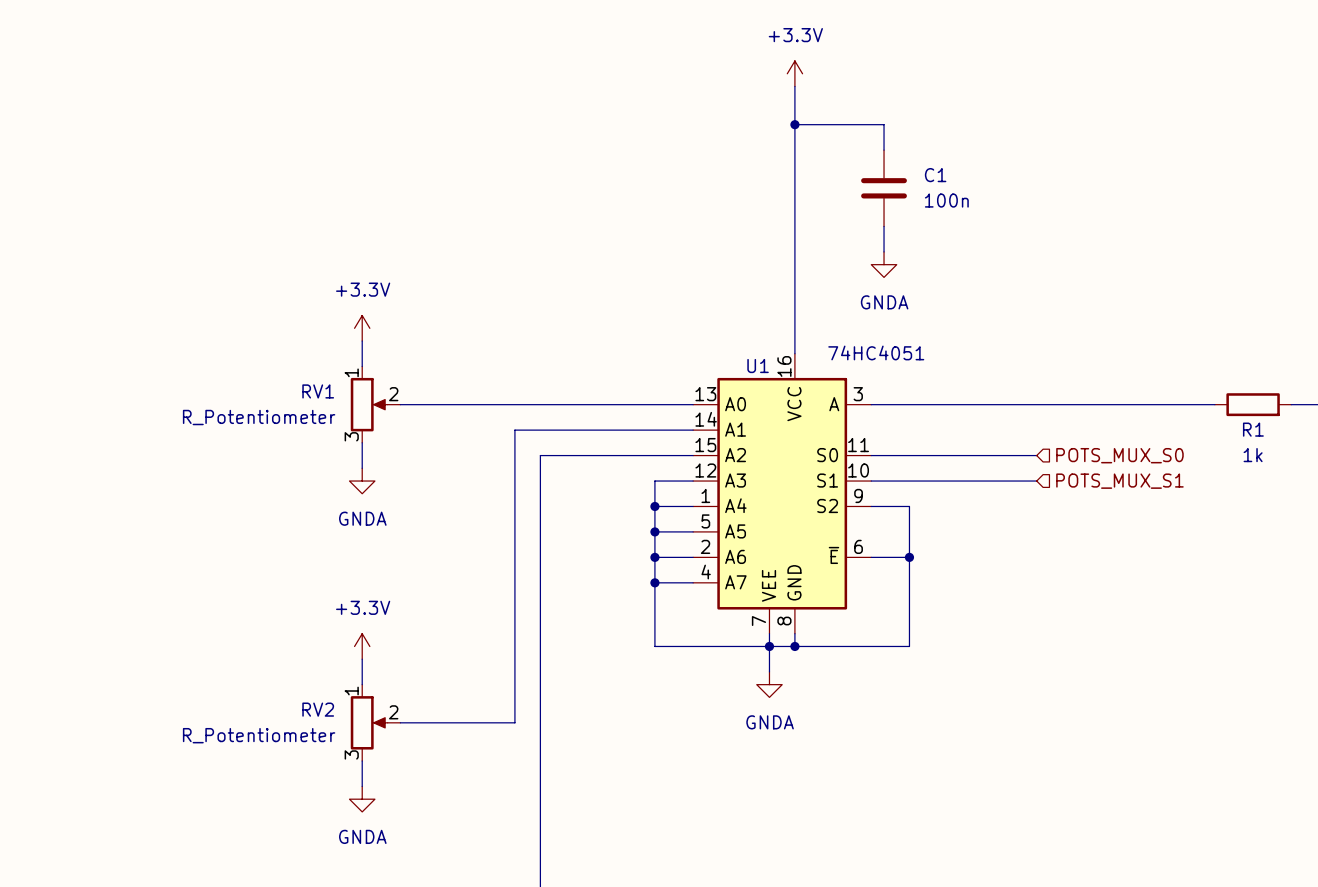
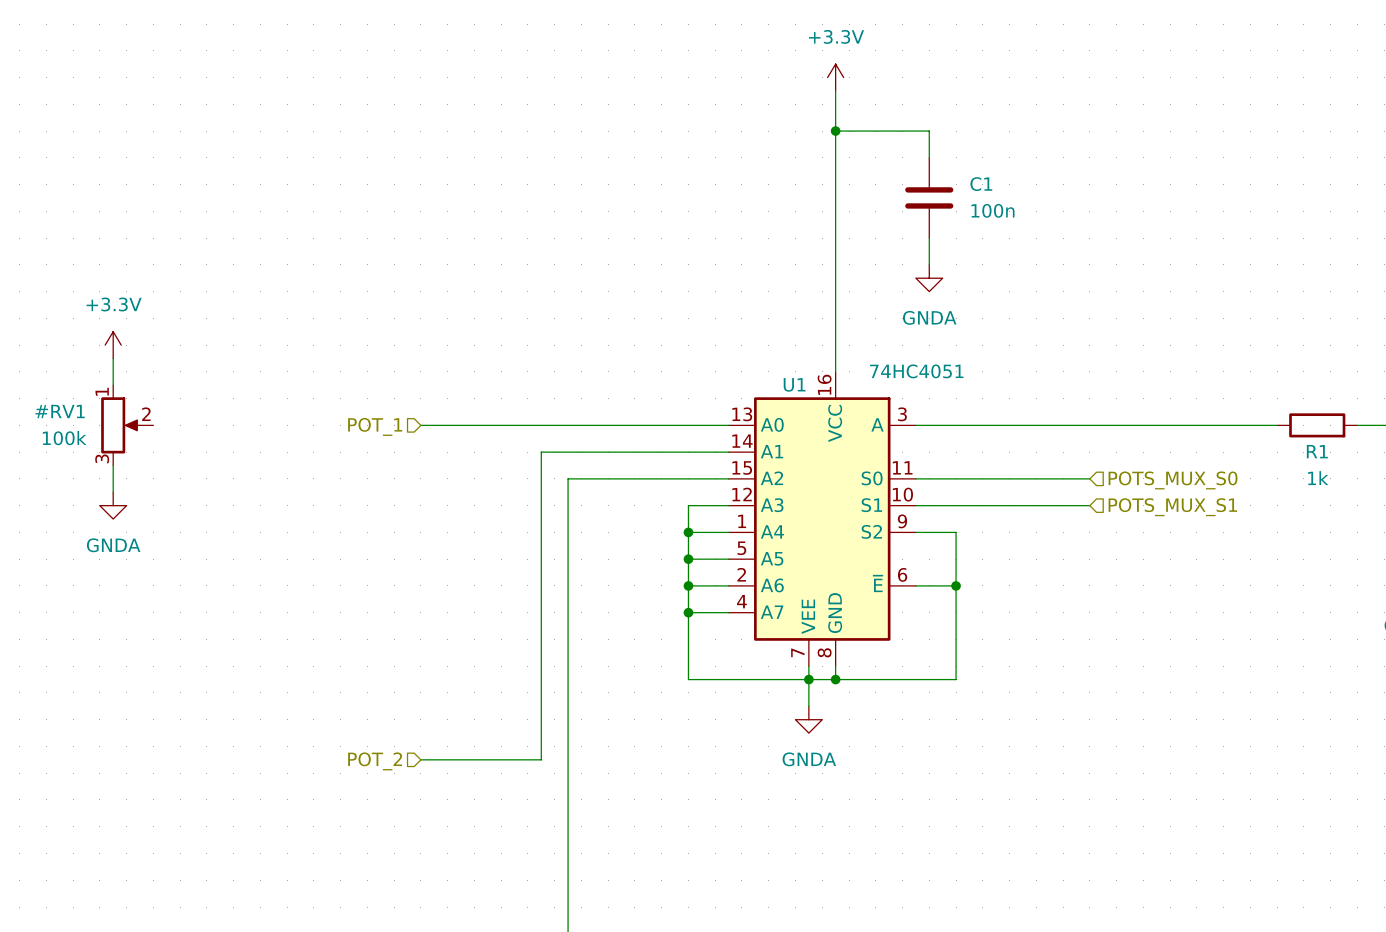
power symbol: none -> +3.3V (113, 345)
power symbol: +3.3V (362, 328) -> none
wire: none -> (113, 358) (113, 385)
wire: (362, 341) (362, 366) -> none
#RV1: none -> 100k (127, 425)
hierarchical label: none -> POT_1 (375, 426)
RV1: R_Potentiometer (375, 404) -> none
wire: none -> (113, 465) (113, 492)
wire: (362, 442) (362, 468) -> none
power symbol: none -> GNDA (113, 505)
power symbol: GNDA (362, 481) -> none
power symbol: +3.3V (362, 646) -> none
wire: (362, 659) (362, 684) -> none
hierarchical label: none -> POT_2 (375, 761)
RV2: R_Potentiometer (375, 722) -> none
wire: (362, 761) (362, 786) -> none
power symbol: GNDA (362, 799) -> none

